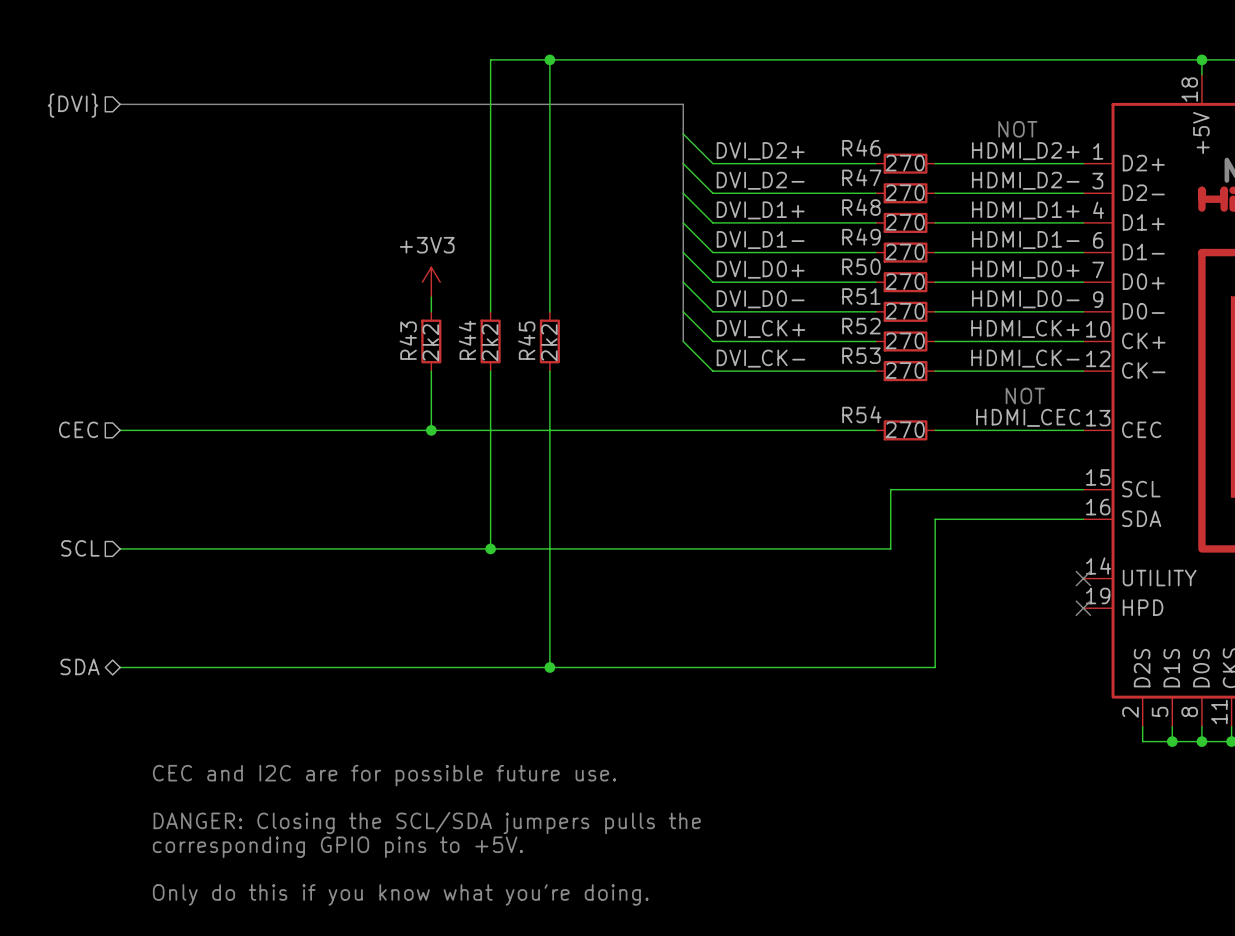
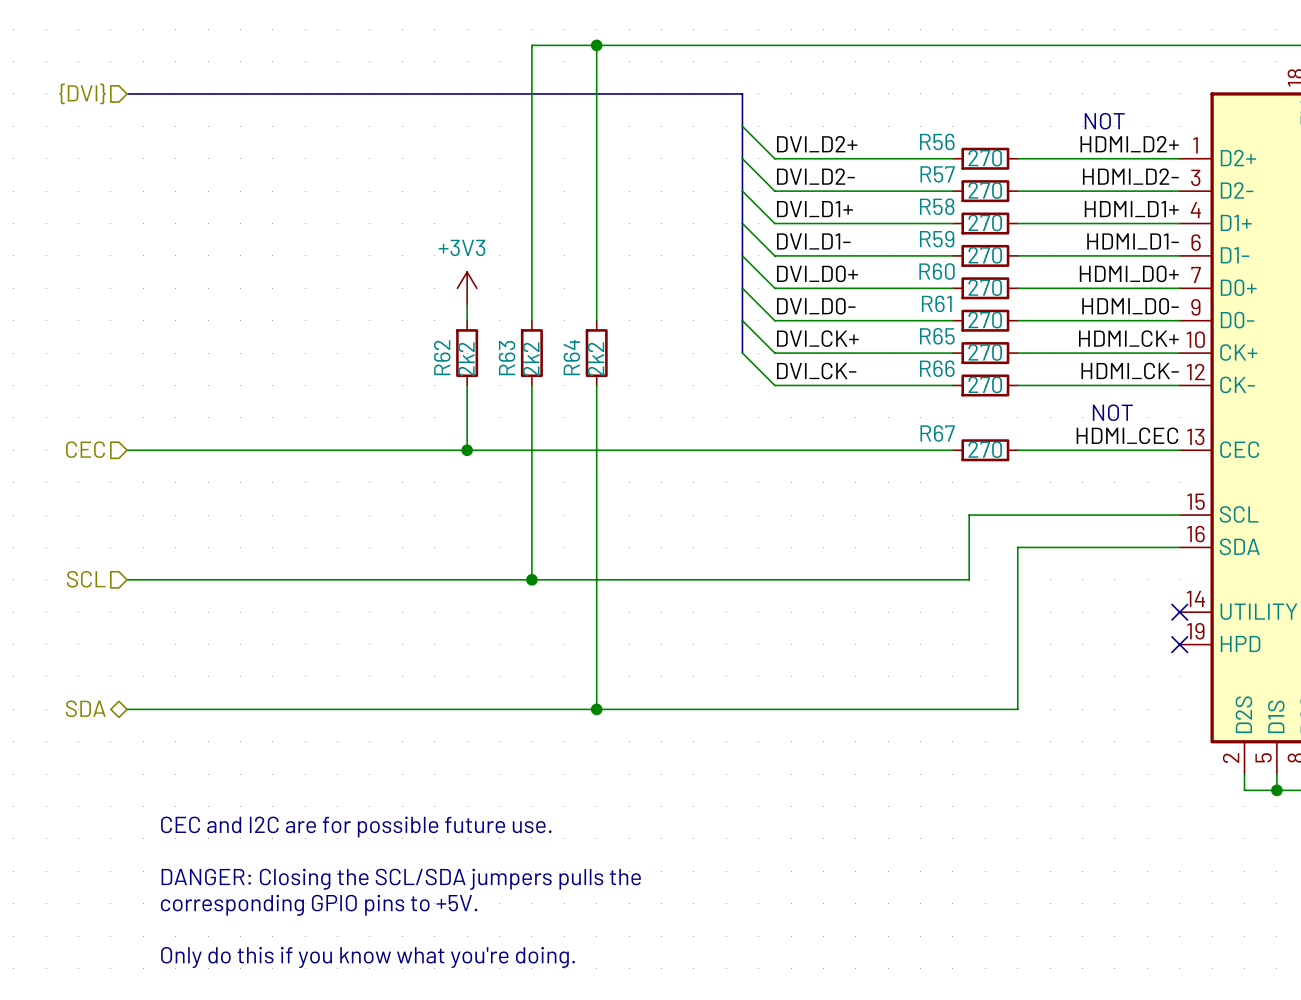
R46 name: R46 (861, 147) -> R56 (937, 141)
R47 name: R47 (861, 177) -> R57 (937, 174)
R48 name: R48 (861, 207) -> R58 (937, 206)
R49 name: R49 (861, 236) -> R59 (937, 239)
R50 name: R50 (861, 266) -> R60 (937, 271)
R51 name: R51 (861, 296) -> R61 (936, 303)
R52 name: R52 (861, 326) -> R65 (937, 336)
R43 name: R43 (408, 340) -> R62 (442, 357)
R44 name: R44 (467, 340) -> R63 (507, 358)
R45 name: R45 (526, 340) -> R64 (571, 357)
R53 name: R53 (861, 355) -> R66 (937, 368)
R54 name: R54 (861, 414) -> R67 (937, 433)

